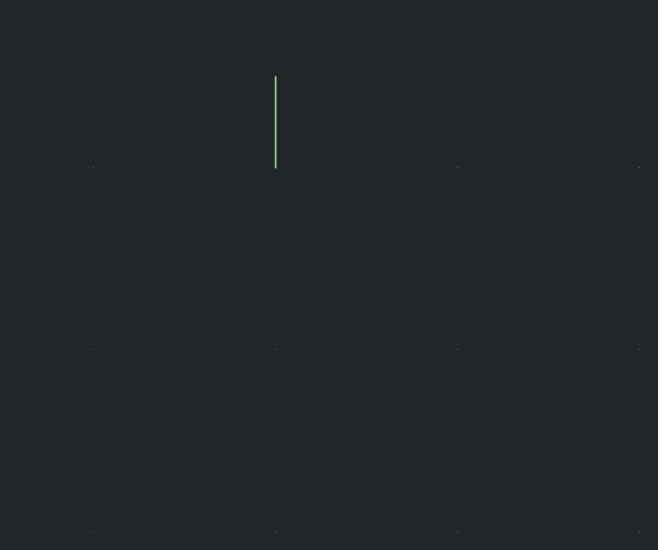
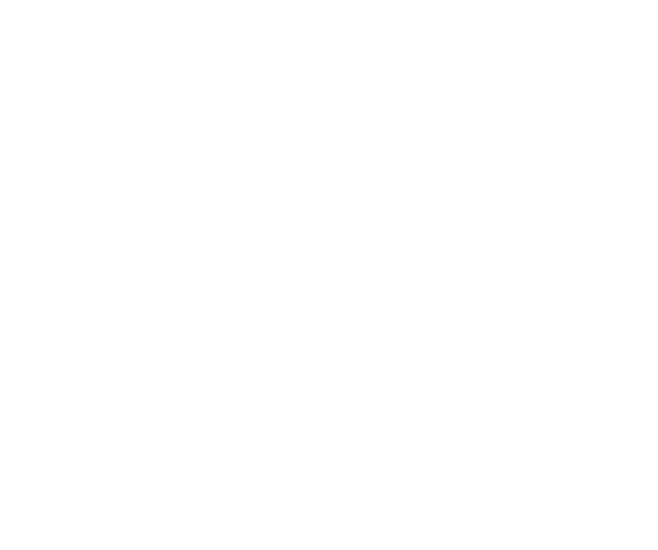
wire: (275, 76) (275, 167) -> none

